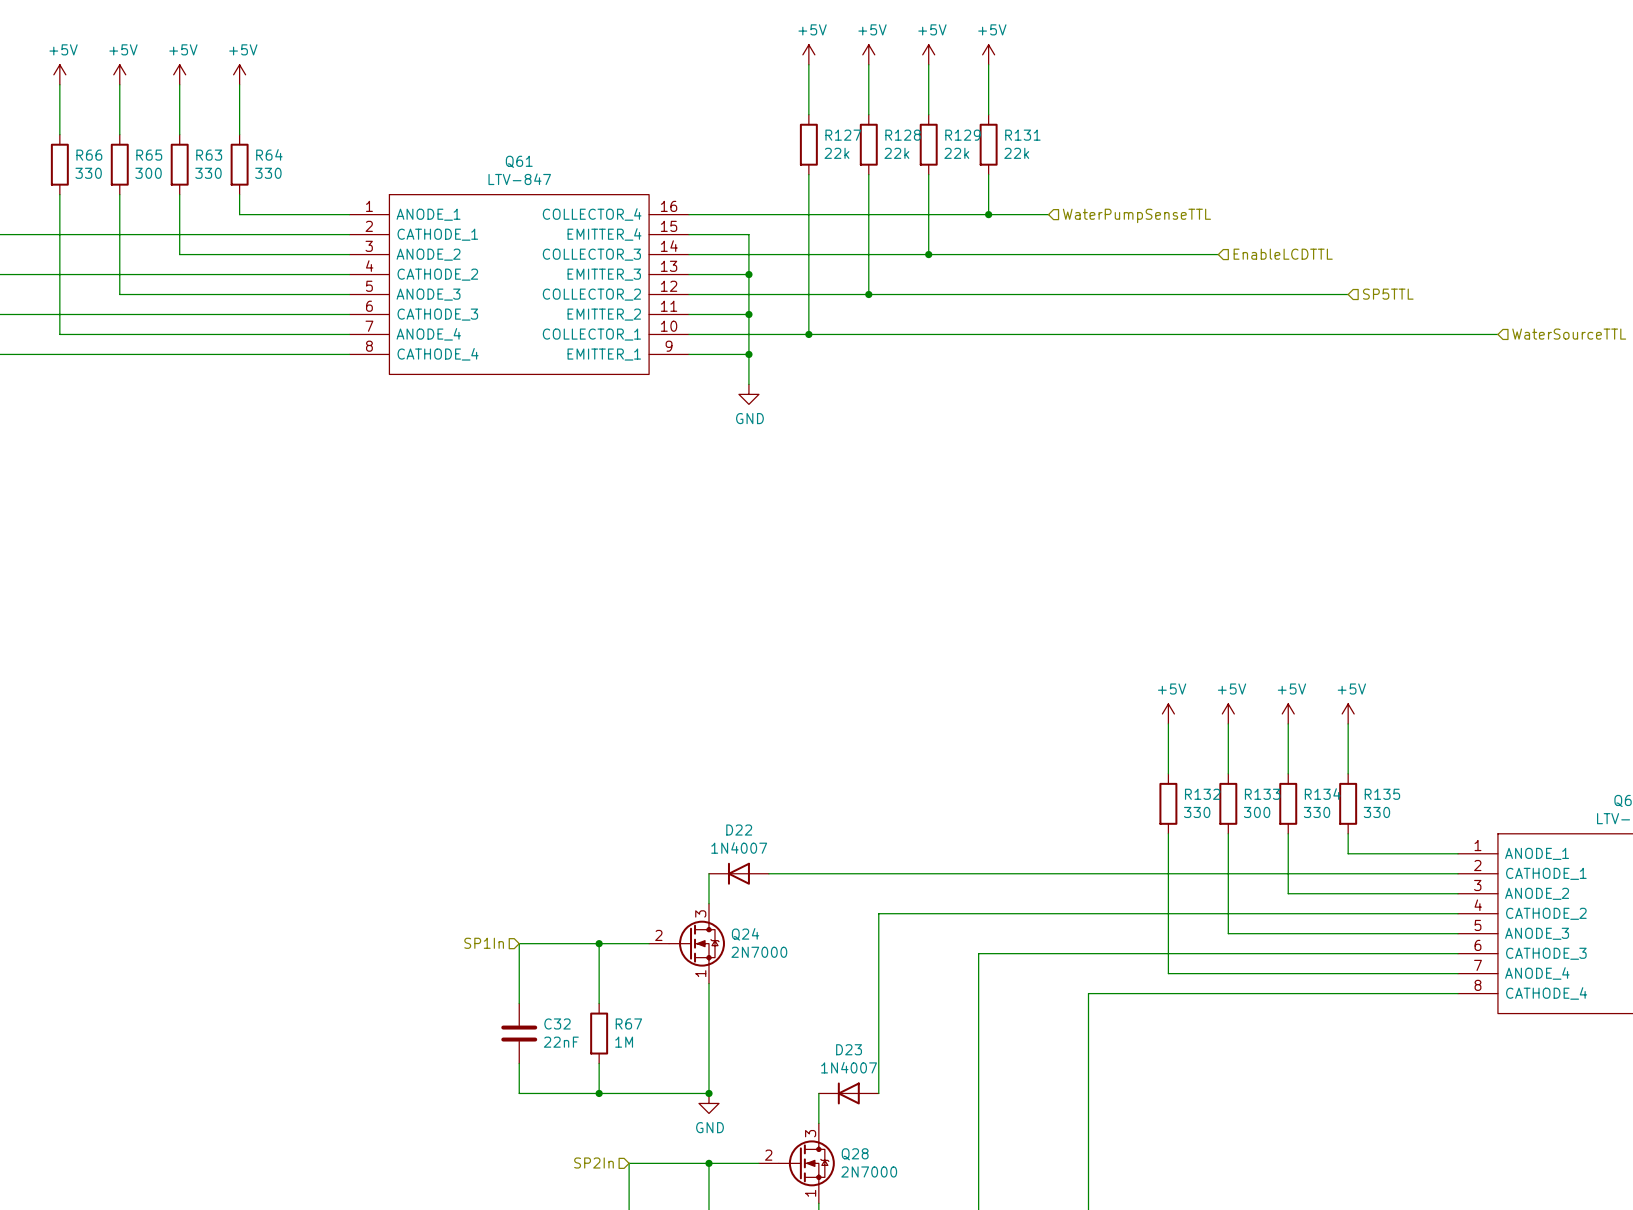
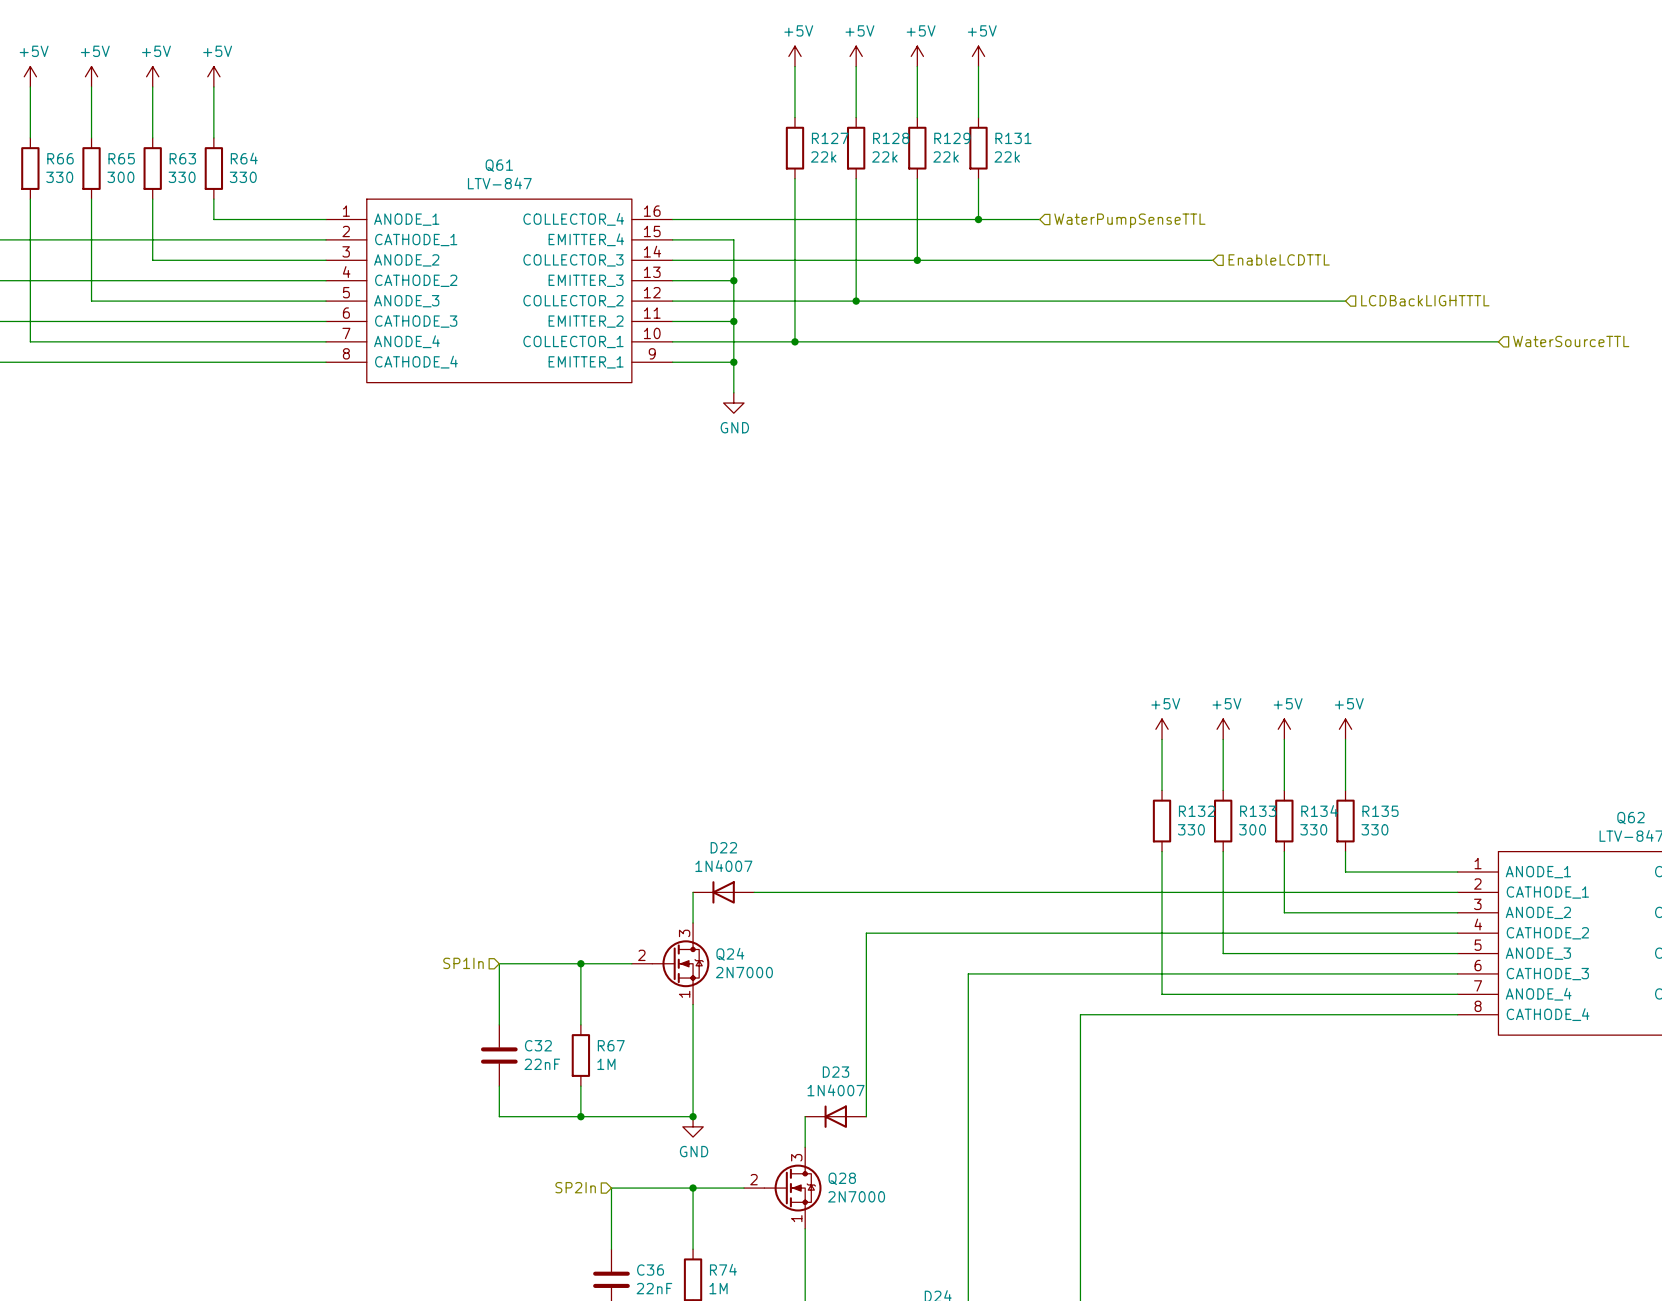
hierarchical label: SP5TTL (1388, 294) -> LCDBackLIGHTTTL (1425, 300)

